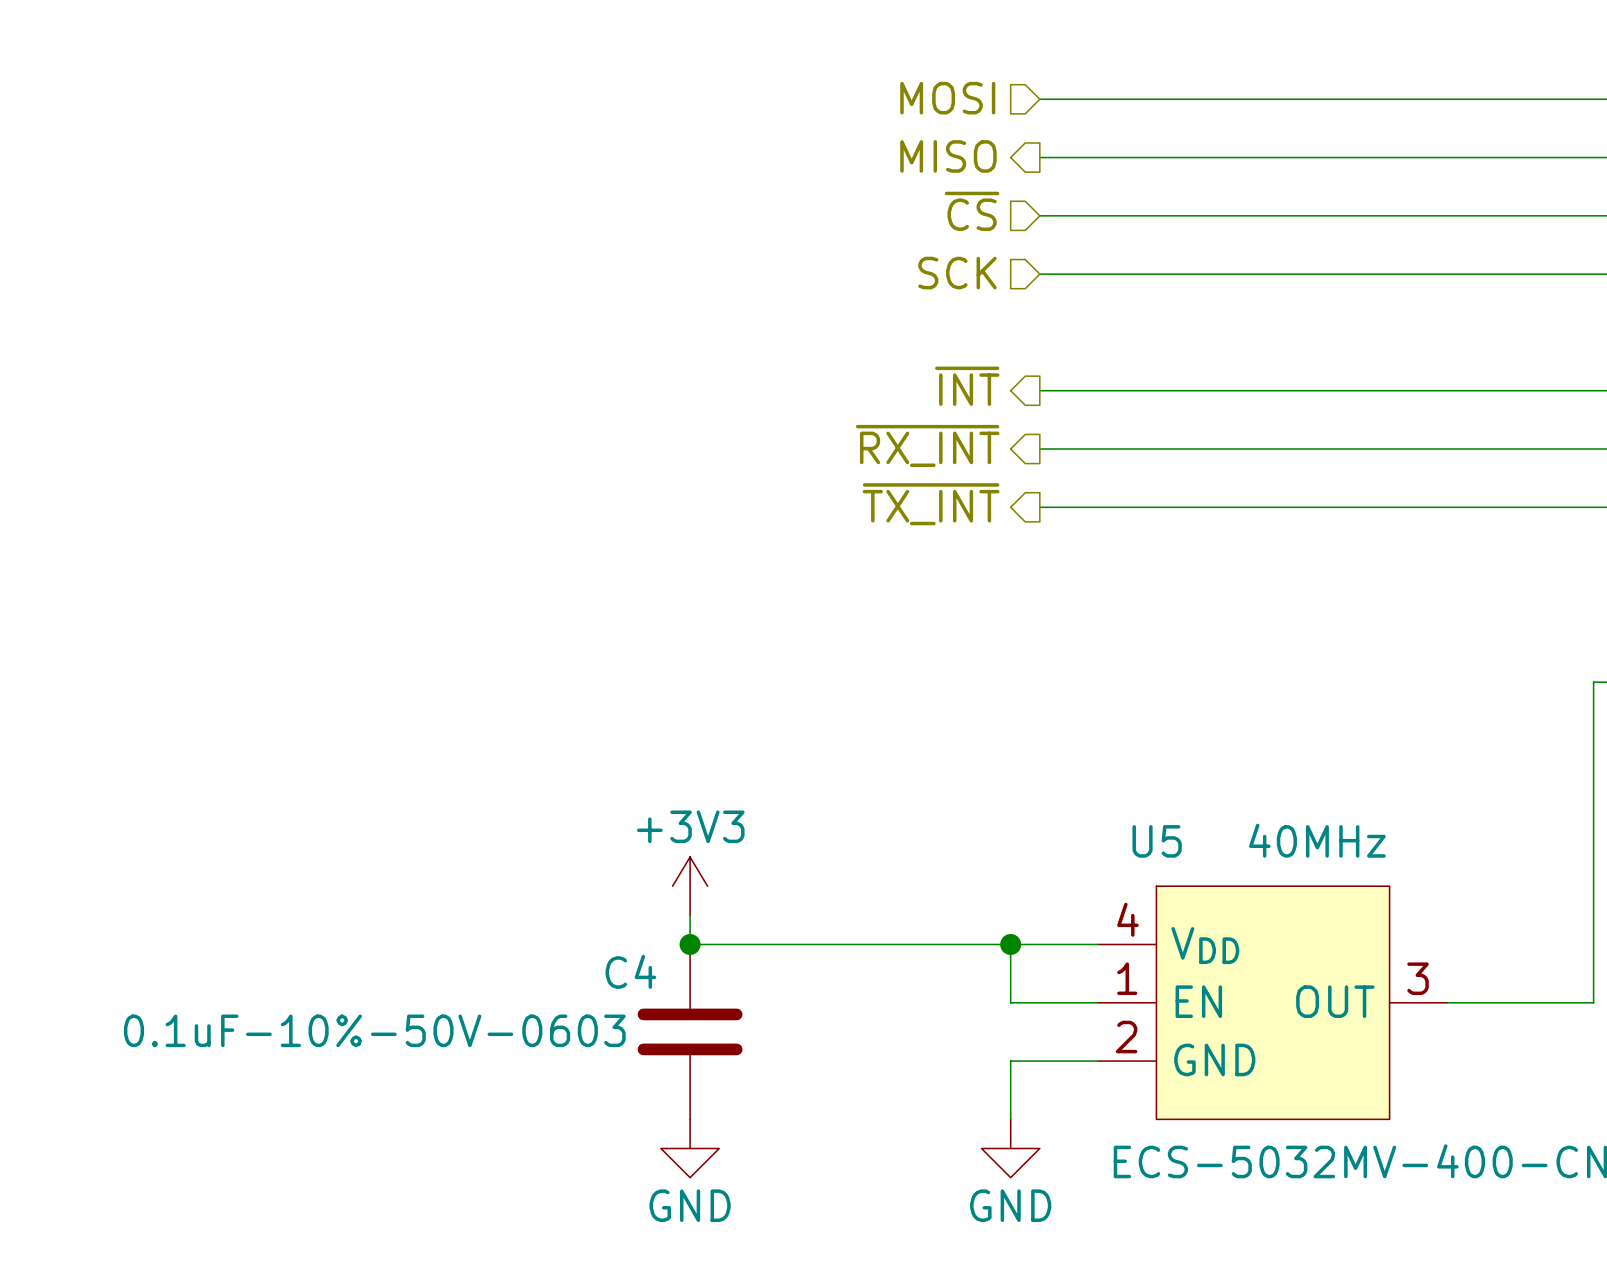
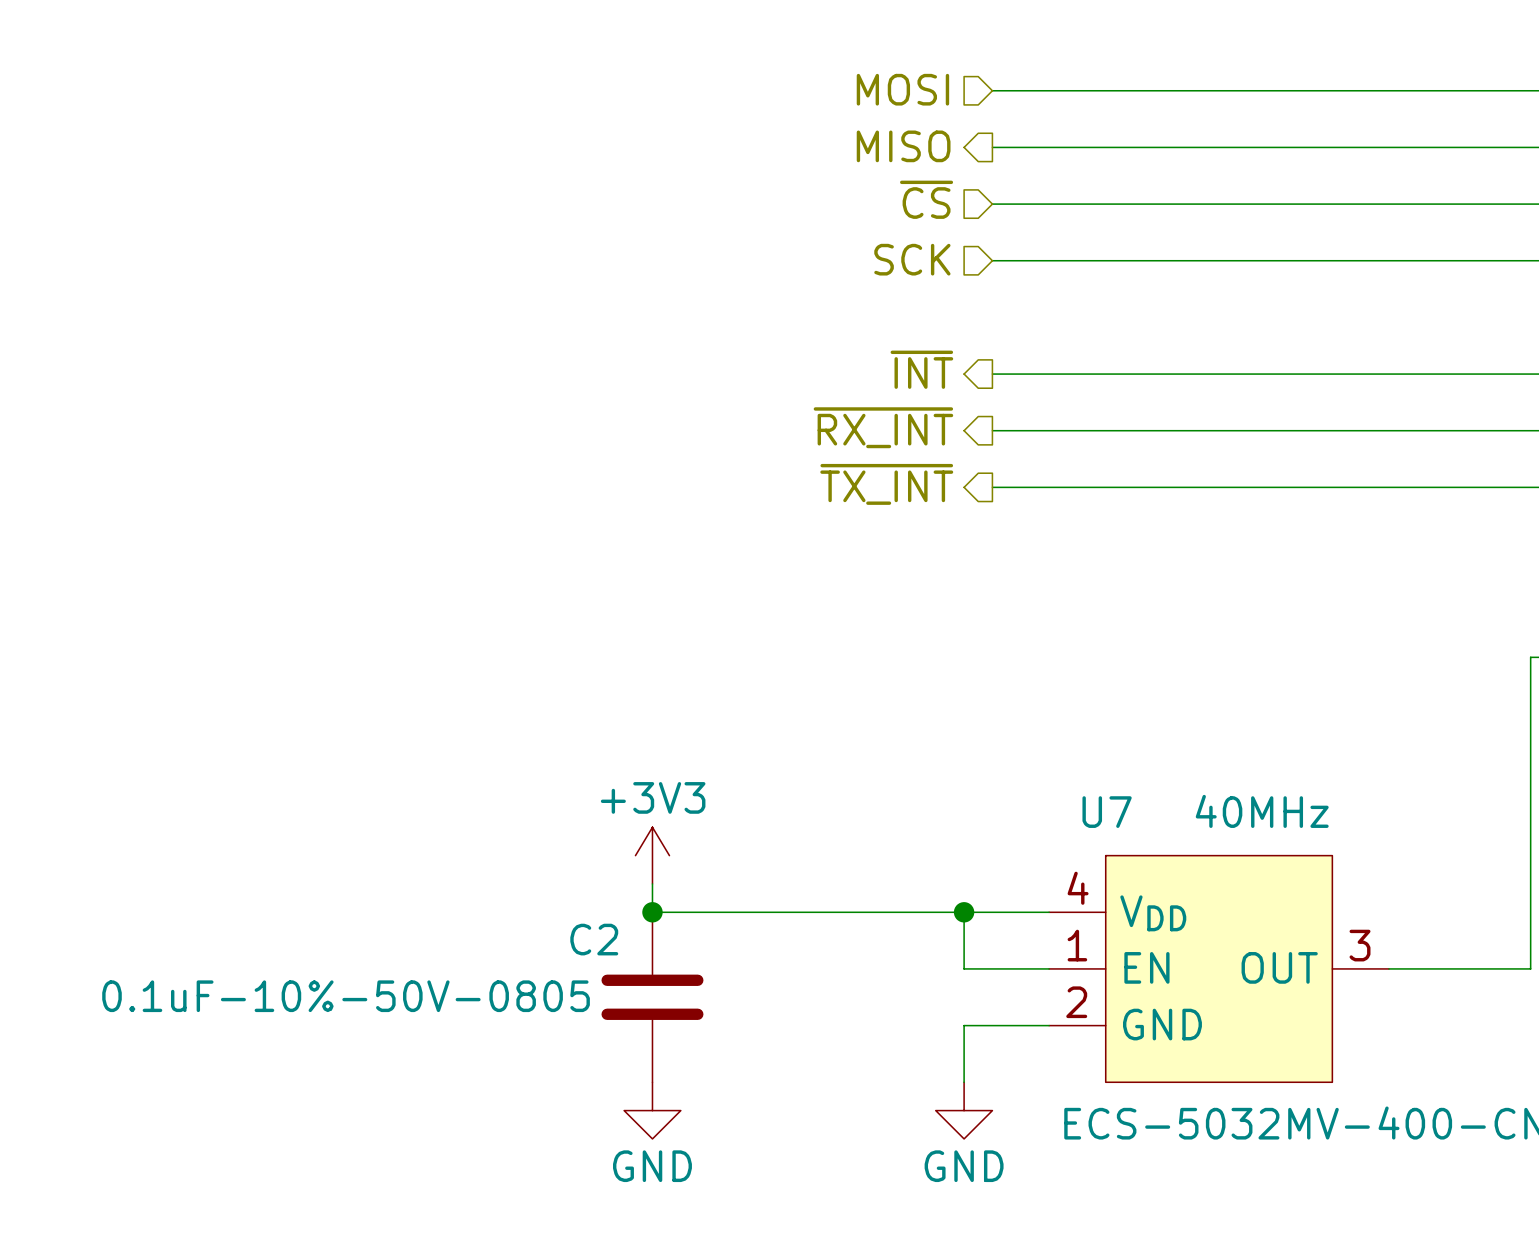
U5 name: U5 (1157, 841) -> U7 (1107, 812)
C4 name: C4 (630, 971) -> C2 (594, 939)
C4 value: 0.1uF-10%-50V-0603 (374, 1030) -> 0.1uF-10%-50V-0805 (346, 996)

